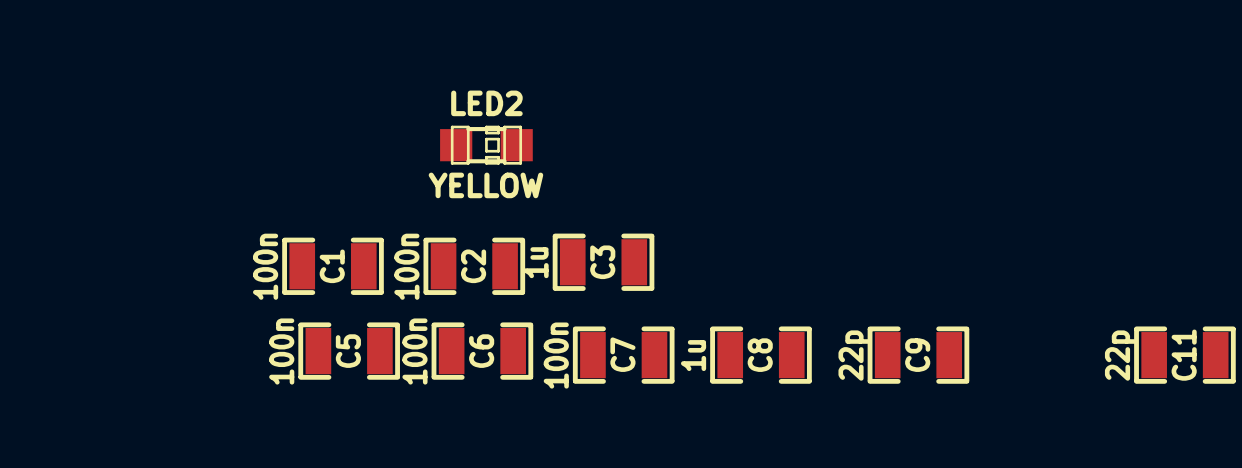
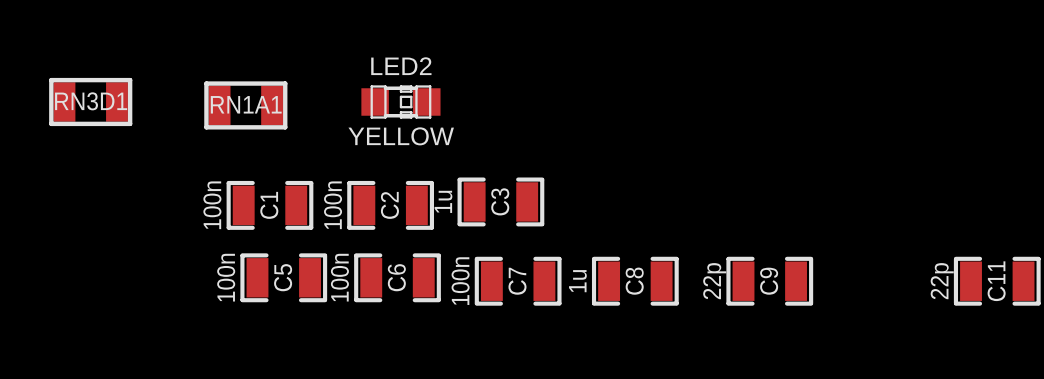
RN3D1: none -> (90, 101)
RN1A1: none -> (245, 105)

